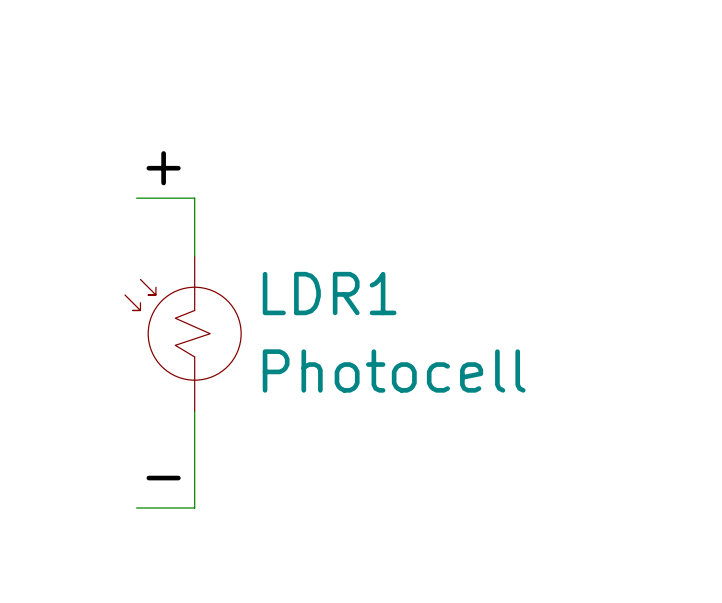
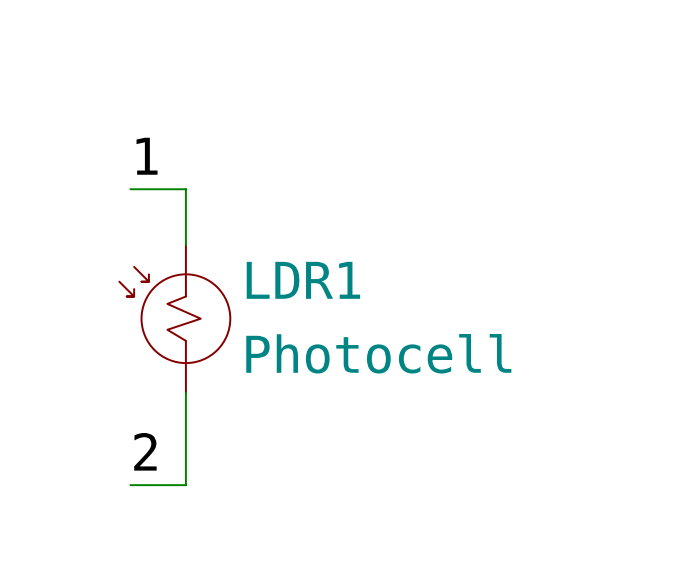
label: + (163, 168) -> 1 (147, 156)
label: - (163, 478) -> 2 (145, 451)

